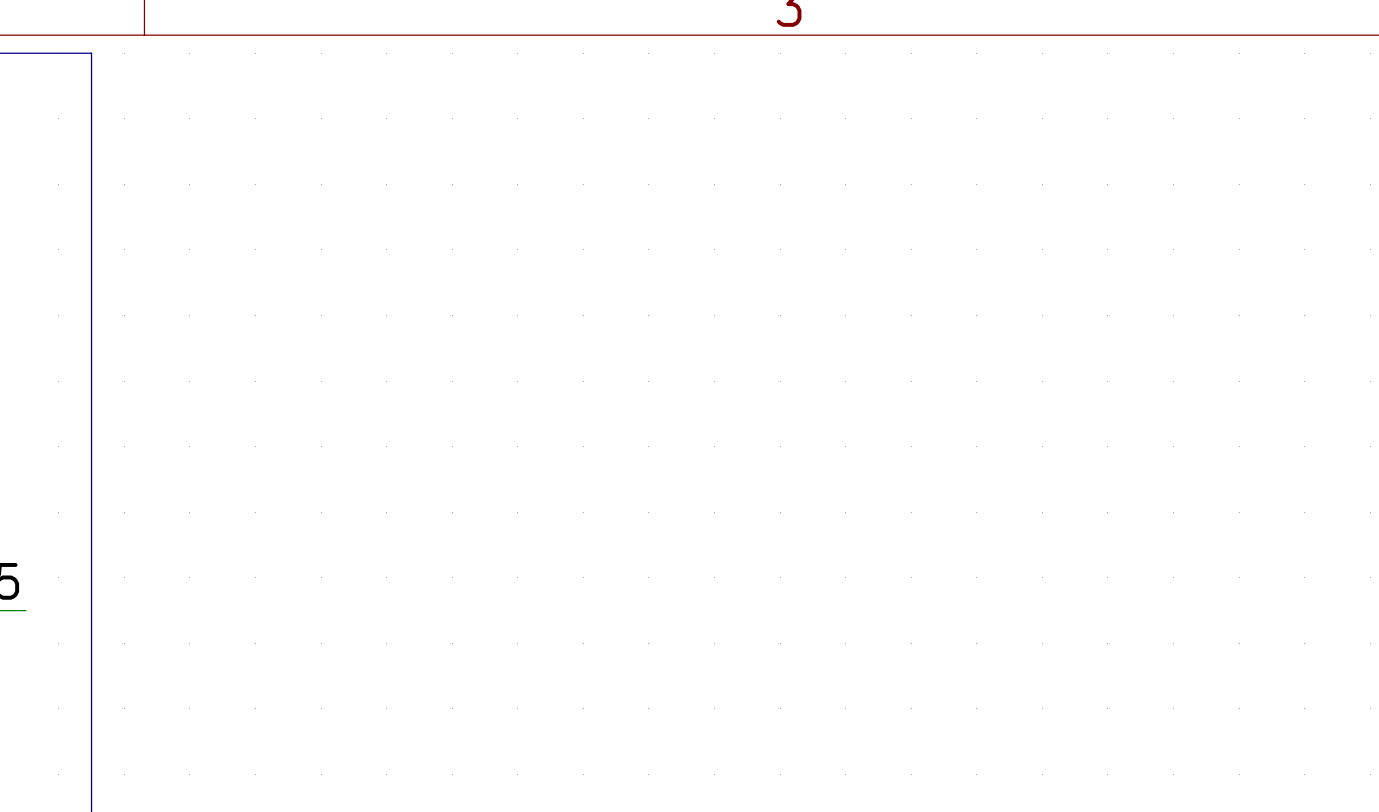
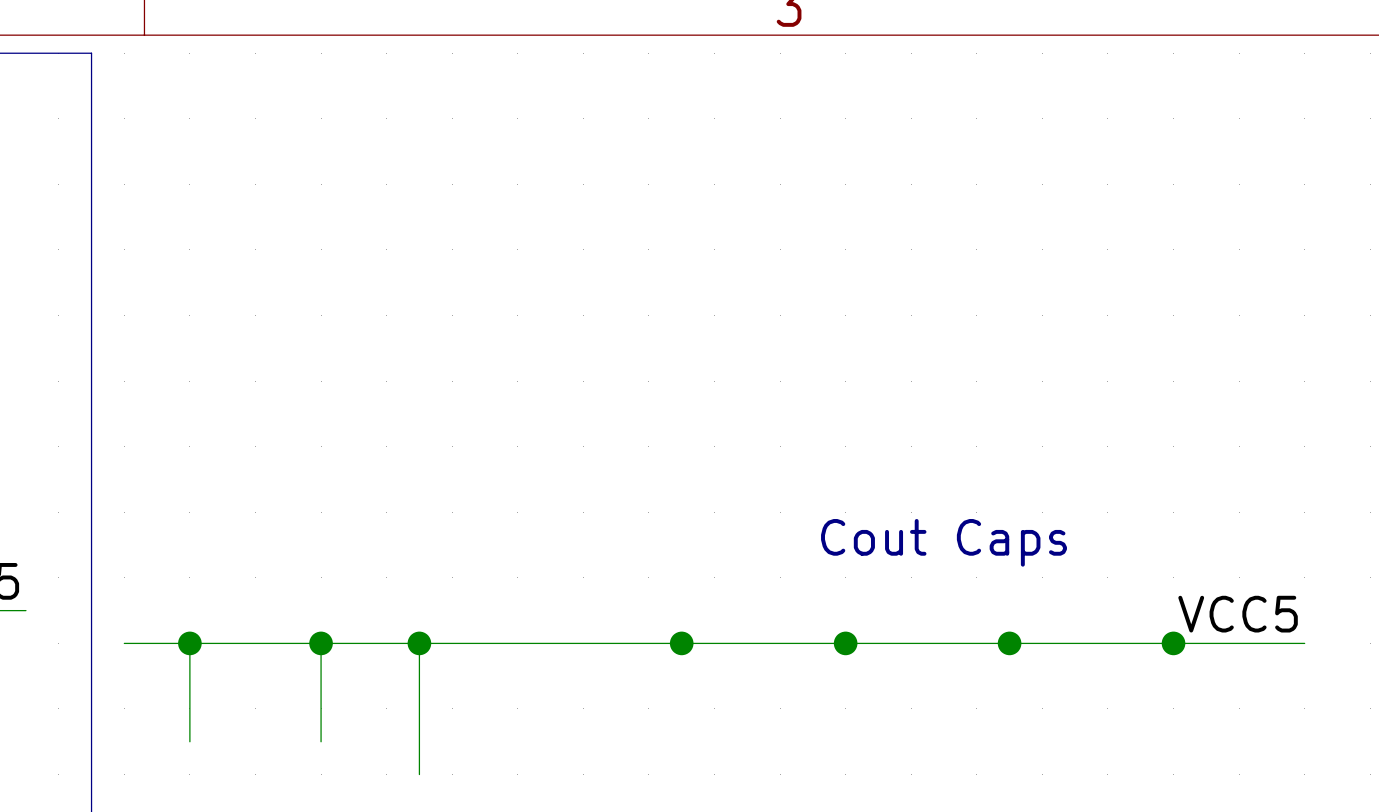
text: none -> Cout Caps (944, 542)
label: none -> VCC5 (1238, 614)
wire: none -> (124, 643) (1304, 643)
wire: none -> (189, 643) (189, 741)
junction: none -> (189, 643)
wire: none -> (321, 643) (321, 741)
junction: none -> (321, 643)
wire: none -> (419, 643) (419, 774)
junction: none -> (419, 643)
junction: none -> (681, 643)
junction: none -> (845, 643)
junction: none -> (1009, 643)
junction: none -> (1173, 643)

